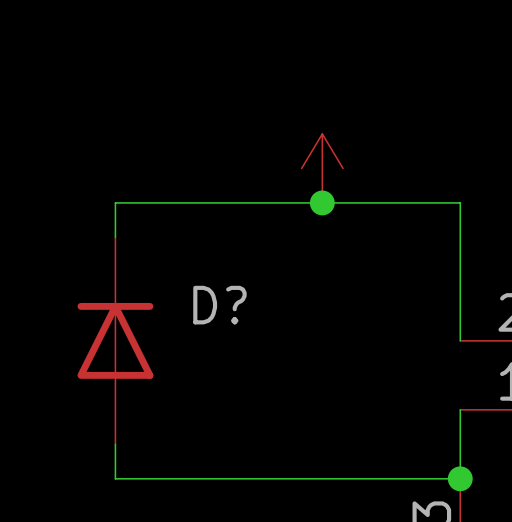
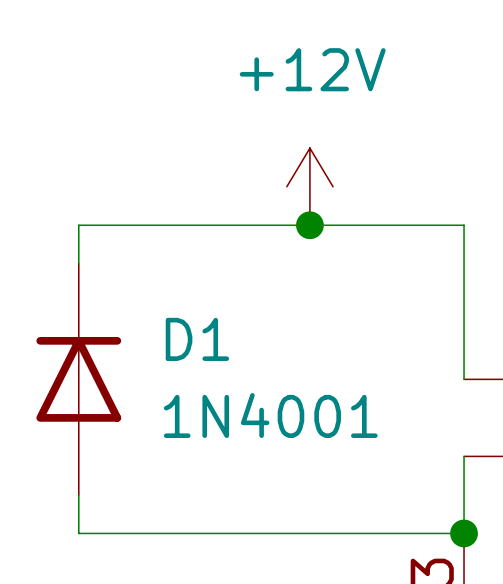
power symbol text: none -> +12V (312, 69)
D? name: D? (219, 305) -> D1 (197, 339)
D? value: none -> 1N4001 (270, 415)

